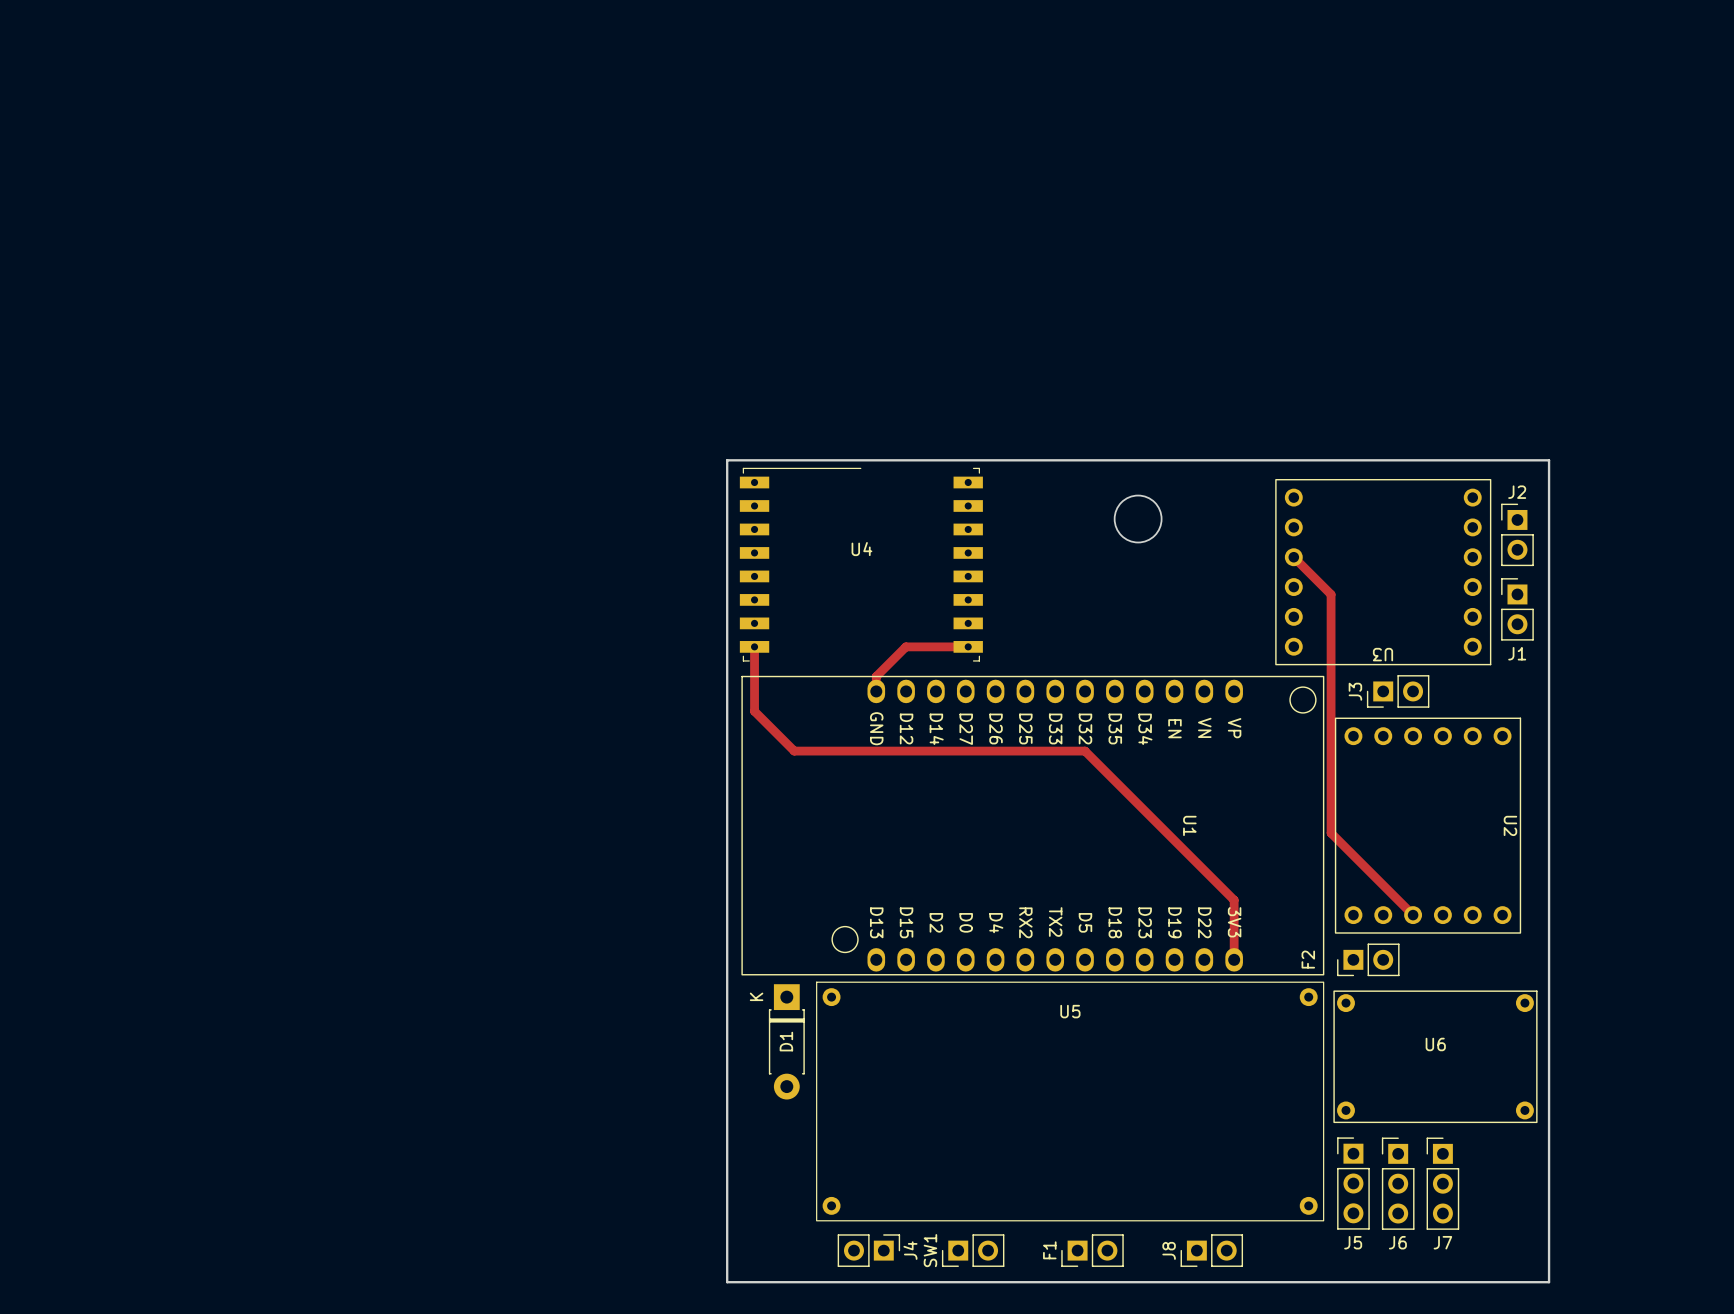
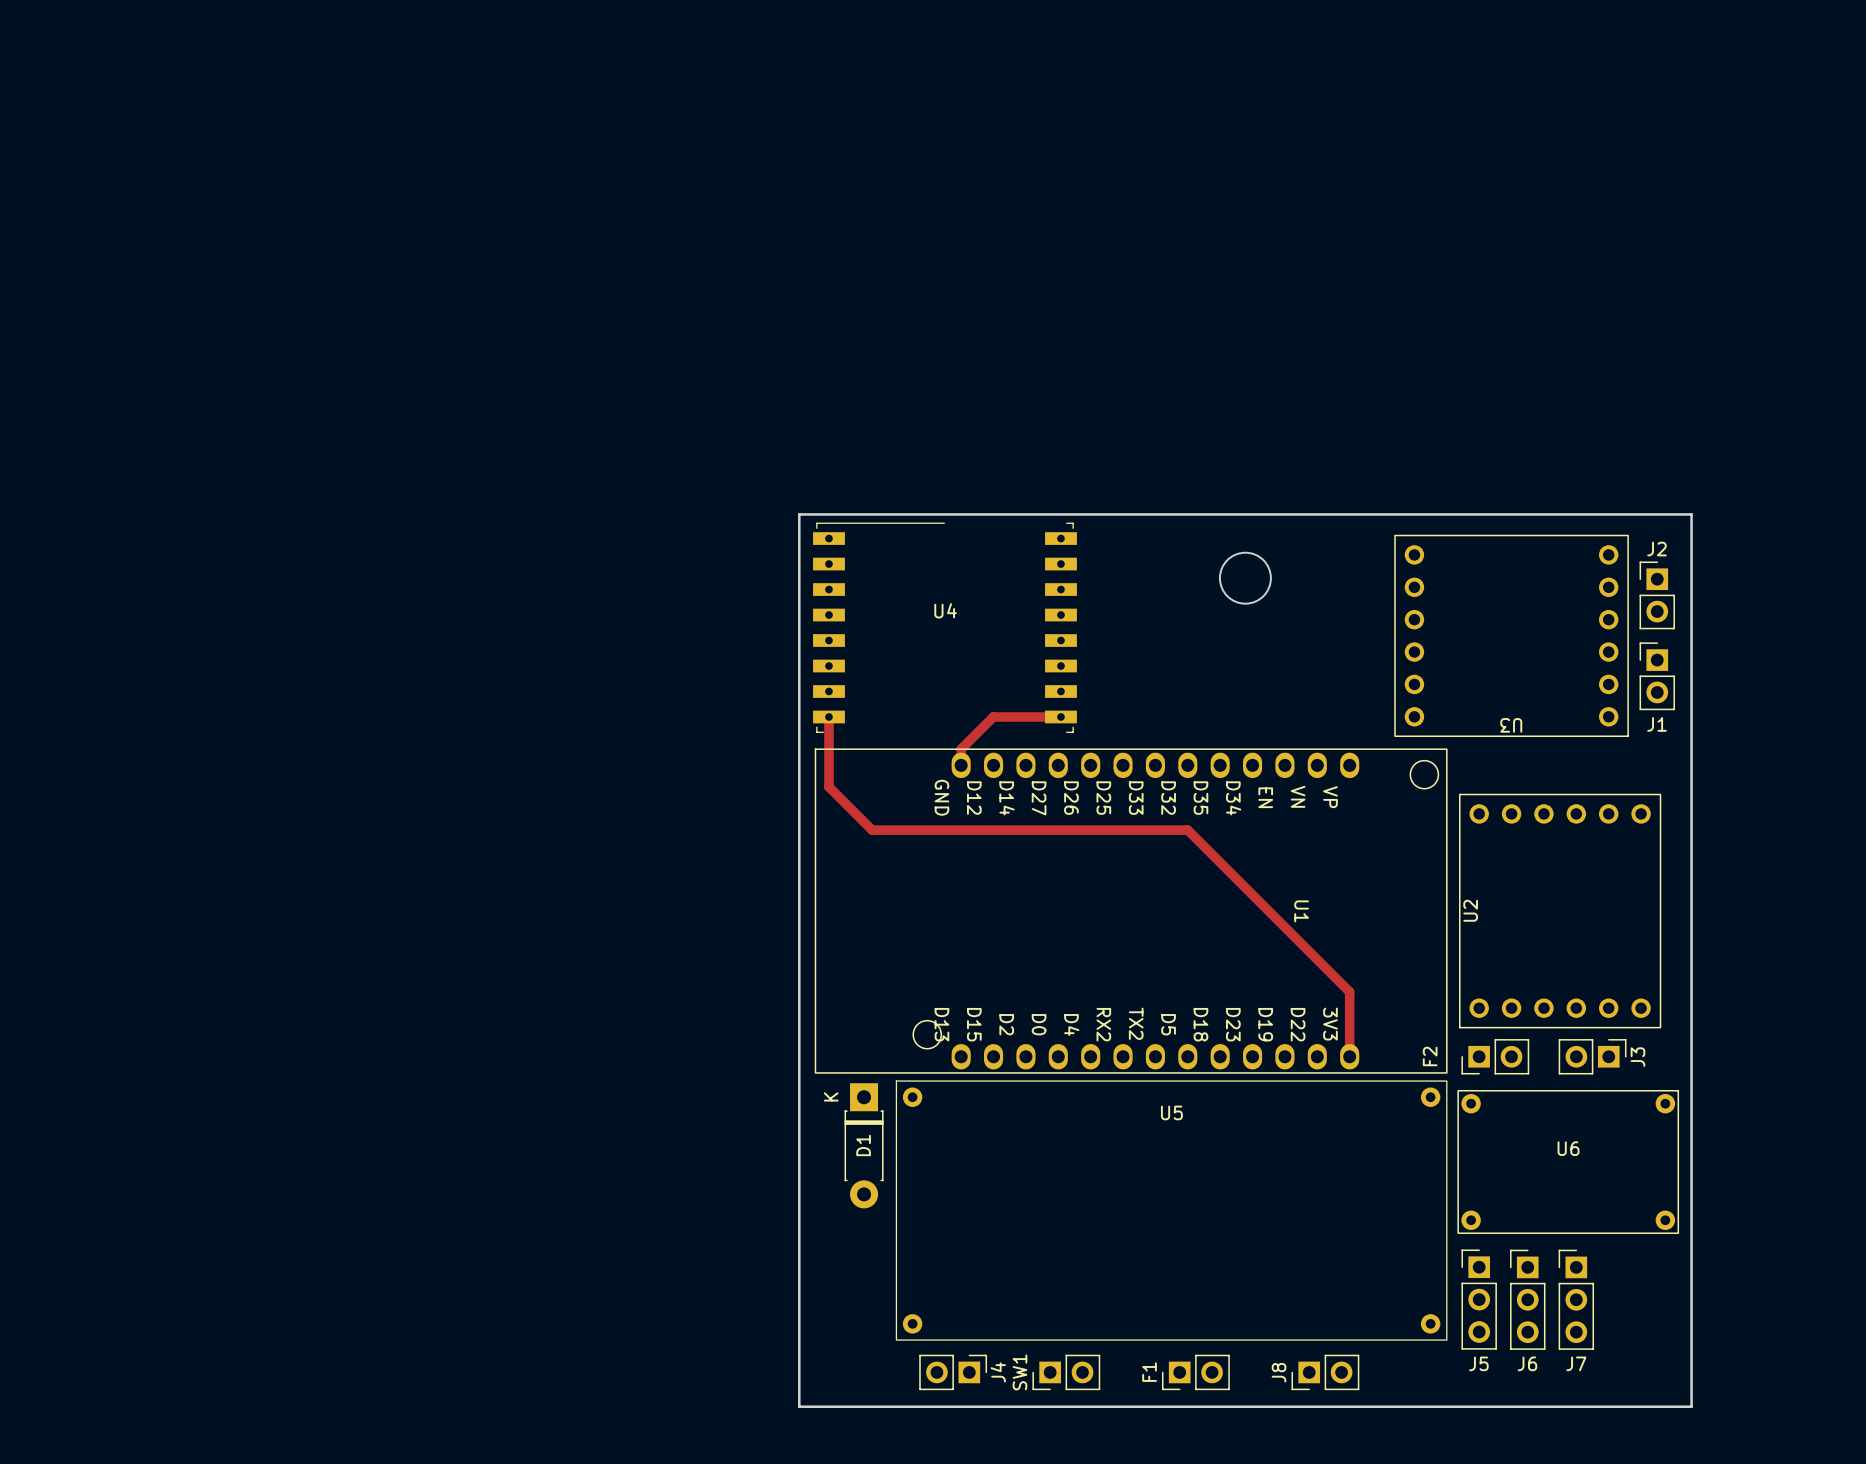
track: (1293, 557) (1331, 594) (1331, 833) (1413, 915) -> none
U1 footprint: [741, 675, 1325, 976] -> [814, 748, 1448, 1074]
J3 rotation: 0° (1398, 691) -> 180° (1592, 1056)
J3 position: (1398, 691) -> (1592, 1056)
U2 name rotation: 0° (1510, 825) -> 180° (1470, 910)
U2 name position: U2 (1510, 825) -> U2 (1470, 910)

